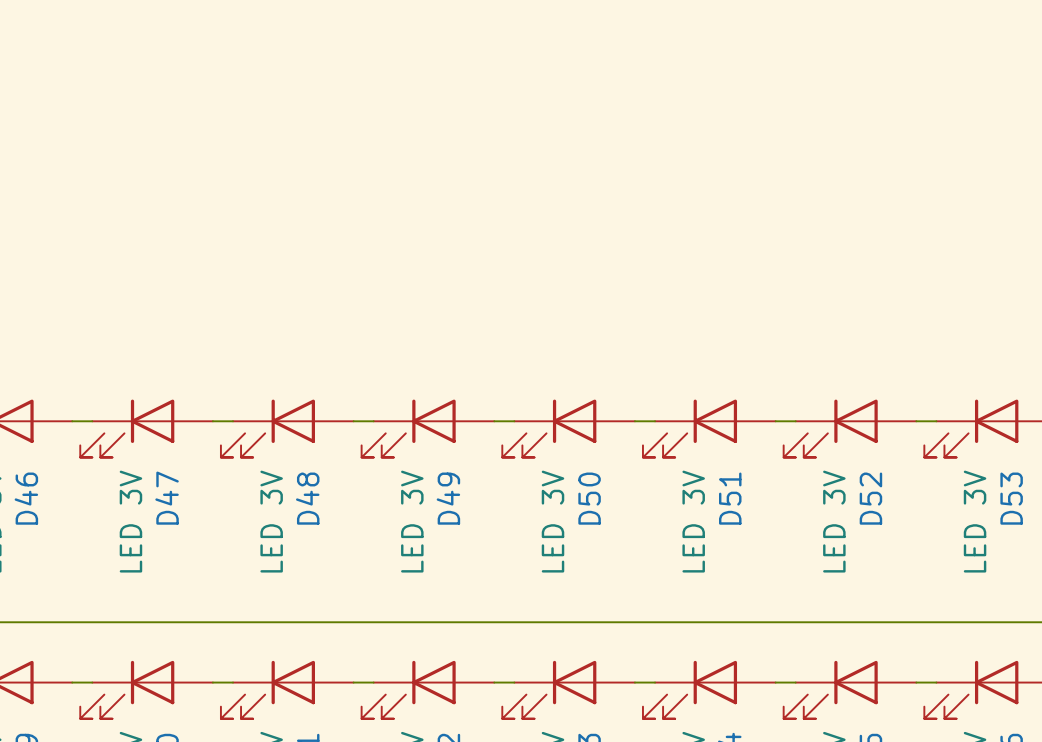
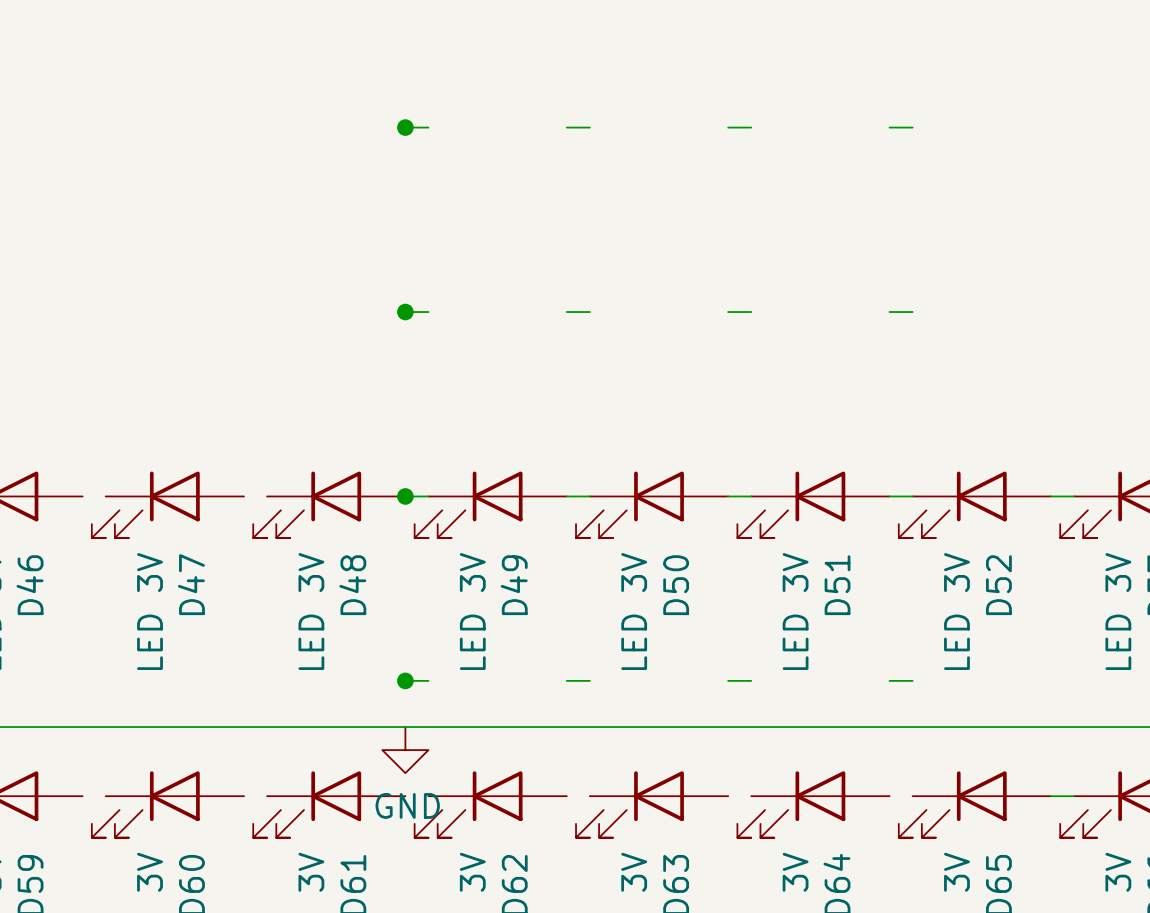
wire: none -> (405, 127) (428, 127)
junction: none -> (405, 127)
wire: none -> (566, 127) (589, 127)
wire: none -> (728, 127) (751, 127)
wire: none -> (889, 127) (912, 127)
junction: none -> (405, 312)
wire: none -> (728, 312) (751, 312)
wire: none -> (889, 312) (912, 312)
wire: (72, 421) (92, 421) -> (405, 312) (428, 312)
wire: (212, 421) (233, 421) -> (566, 312) (589, 312)
junction: none -> (405, 496)
junction: none -> (405, 680)
power symbol: none -> GND (405, 750)
wire: (72, 682) (92, 682) -> none
wire: (212, 682) (233, 682) -> none
wire: (353, 682) (373, 682) -> (405, 680) (428, 680)
wire: (494, 682) (514, 682) -> (566, 680) (589, 680)
wire: (634, 682) (655, 682) -> (728, 680) (751, 680)
wire: (775, 682) (795, 682) -> (889, 680) (912, 680)

